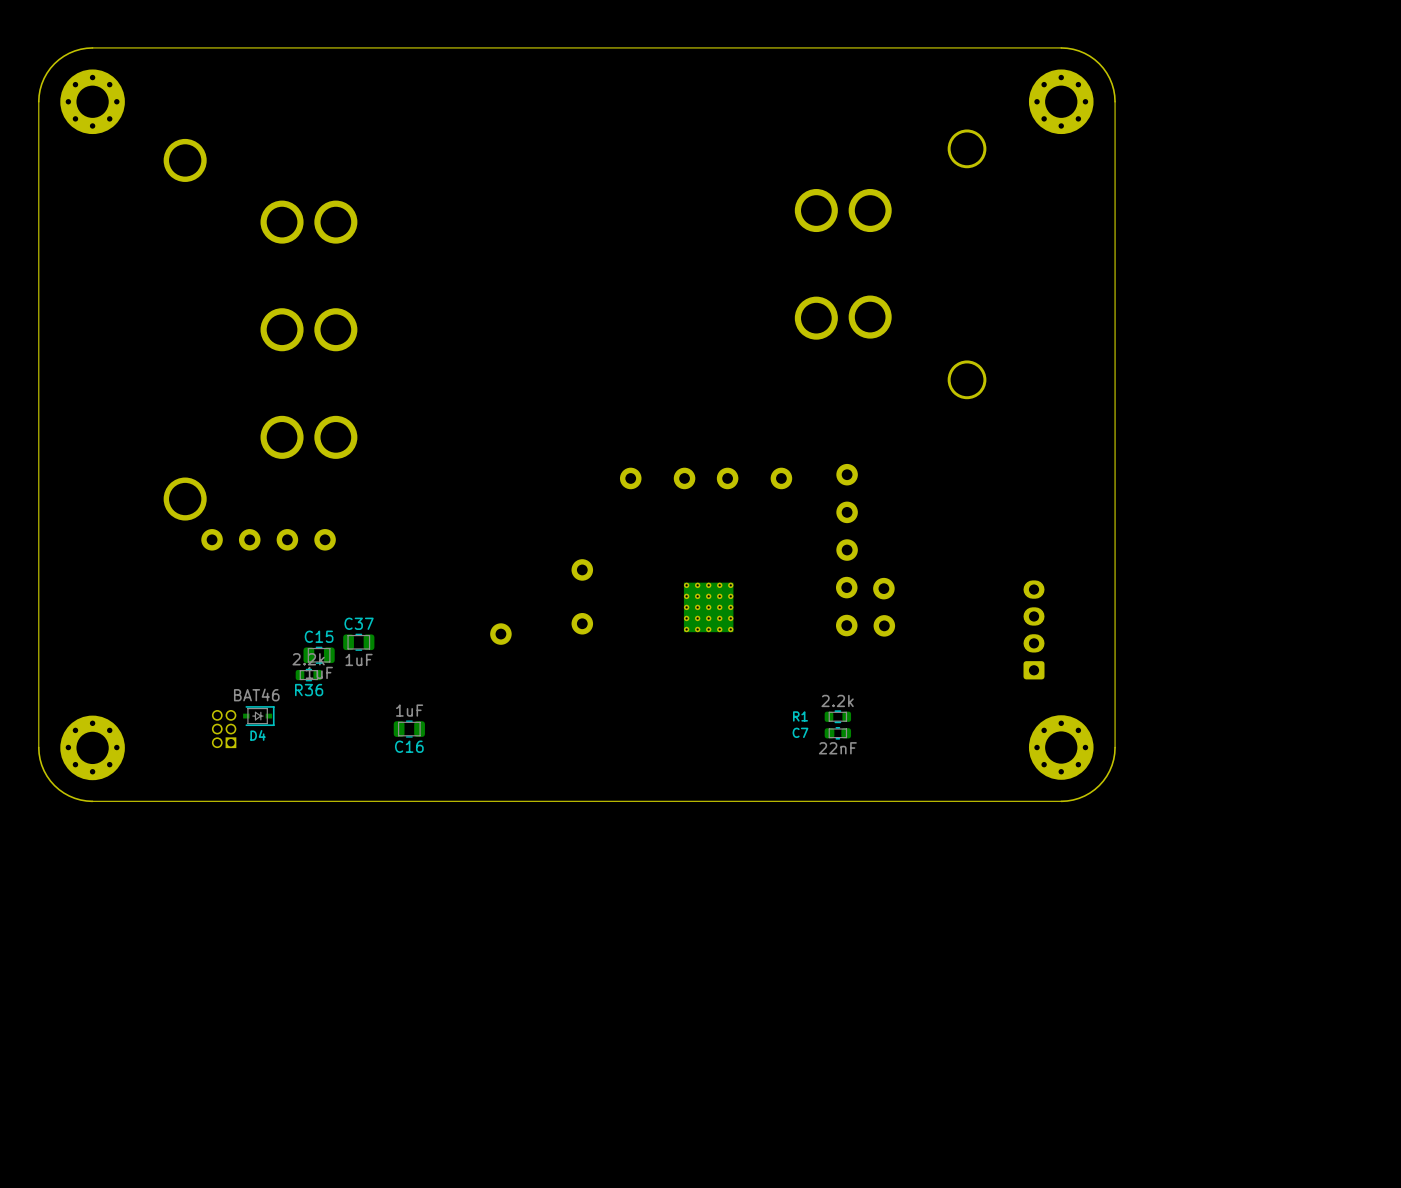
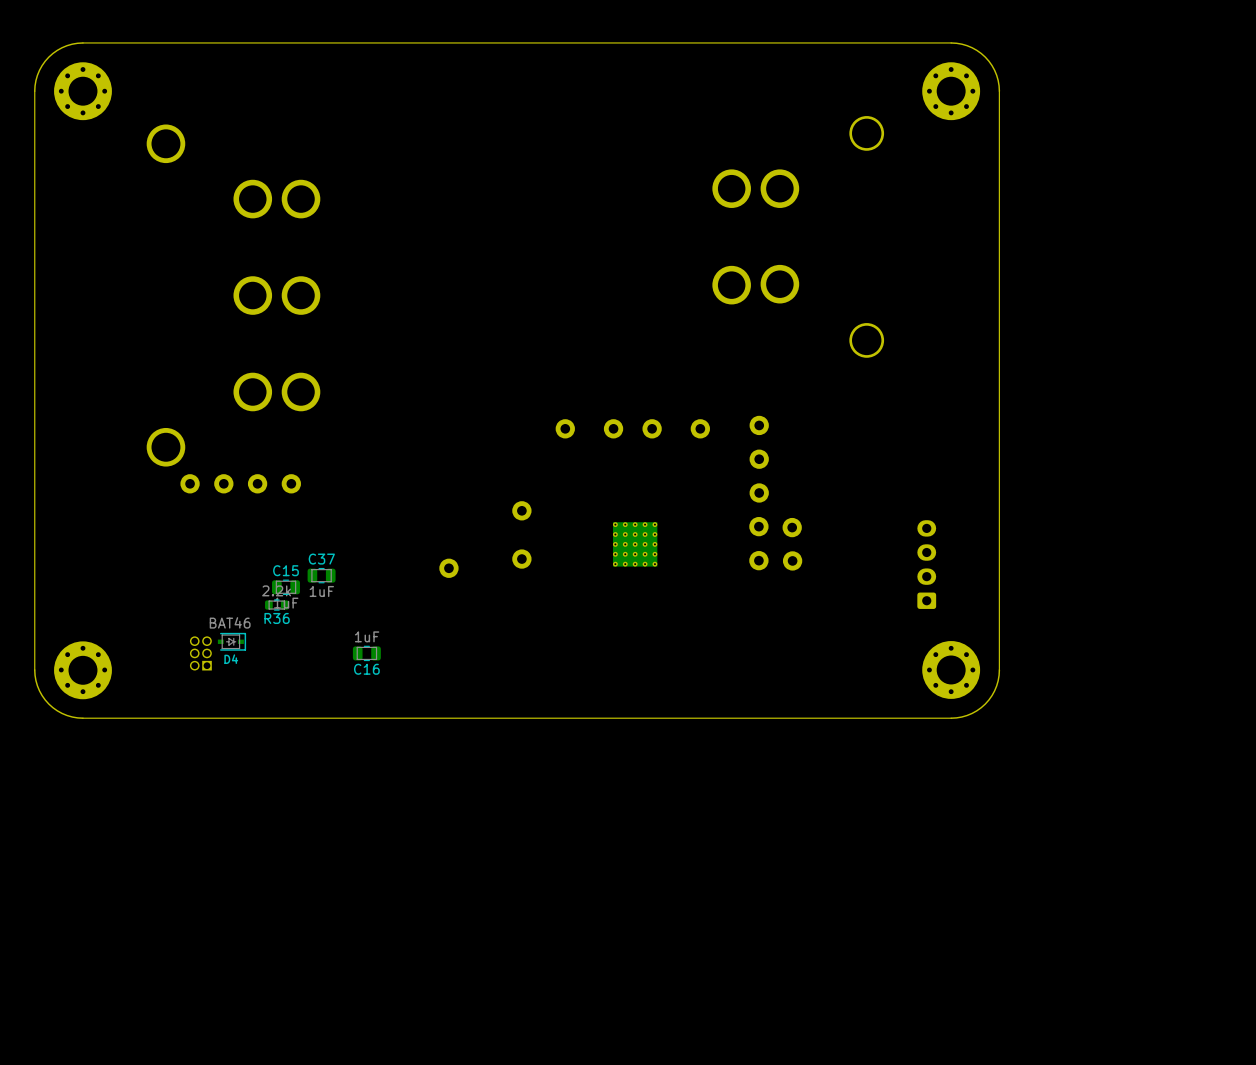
R1: 2.2k (837, 716) -> none
C7: 22nF (837, 733) -> none

